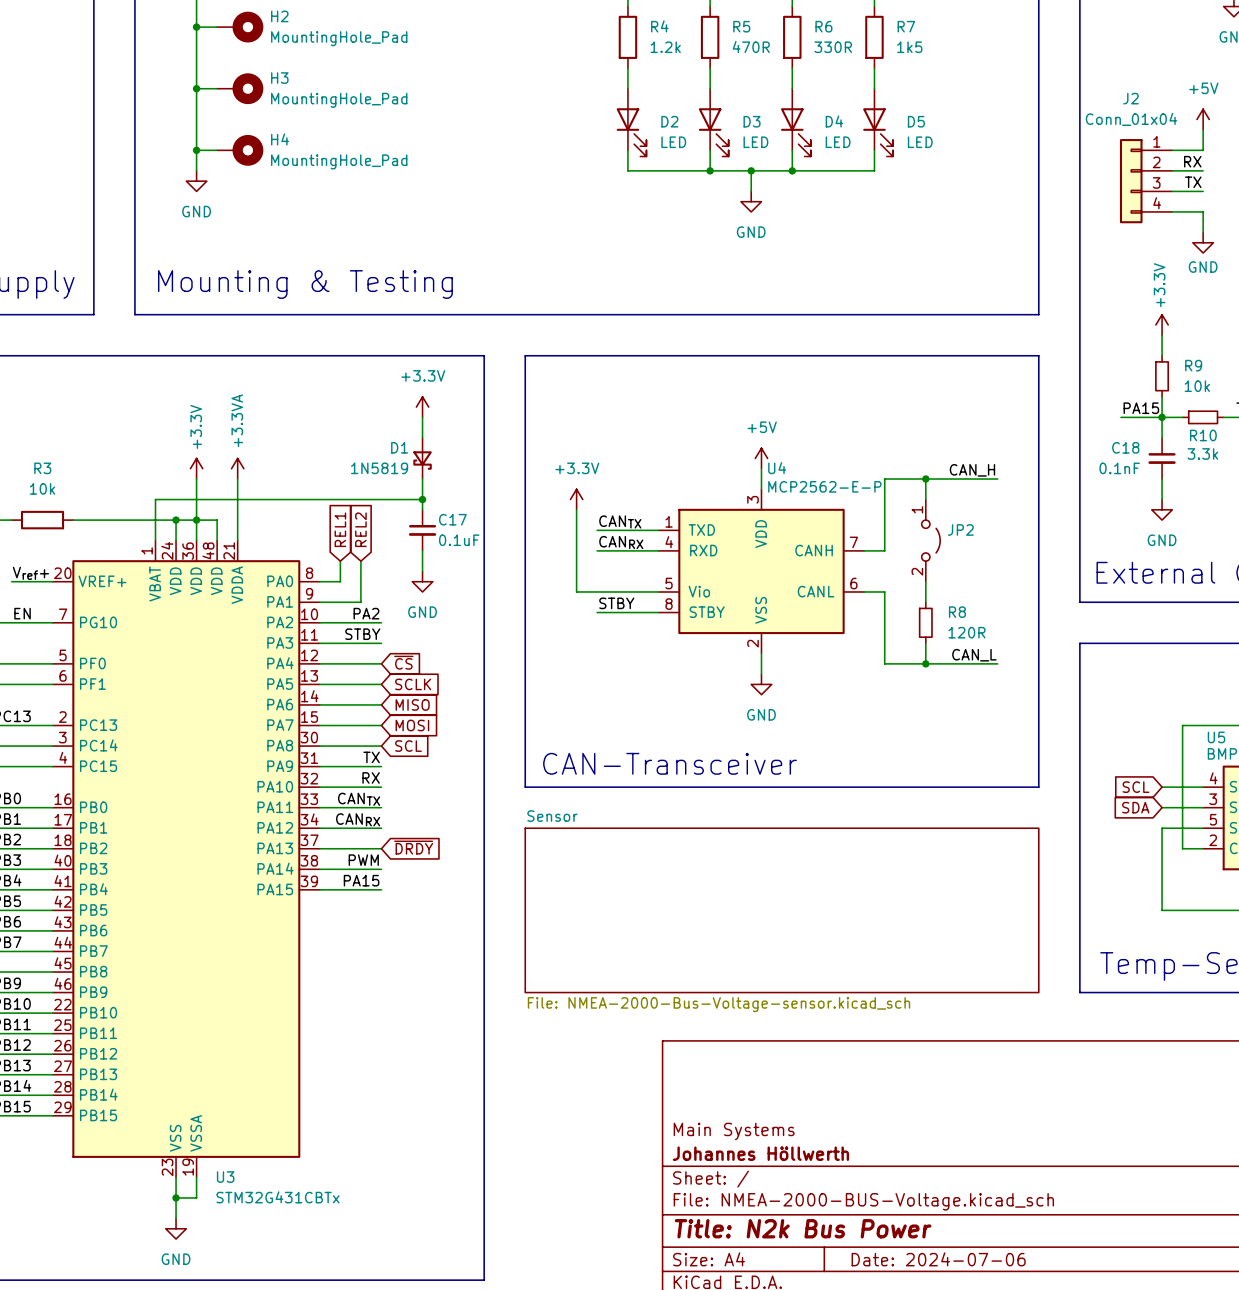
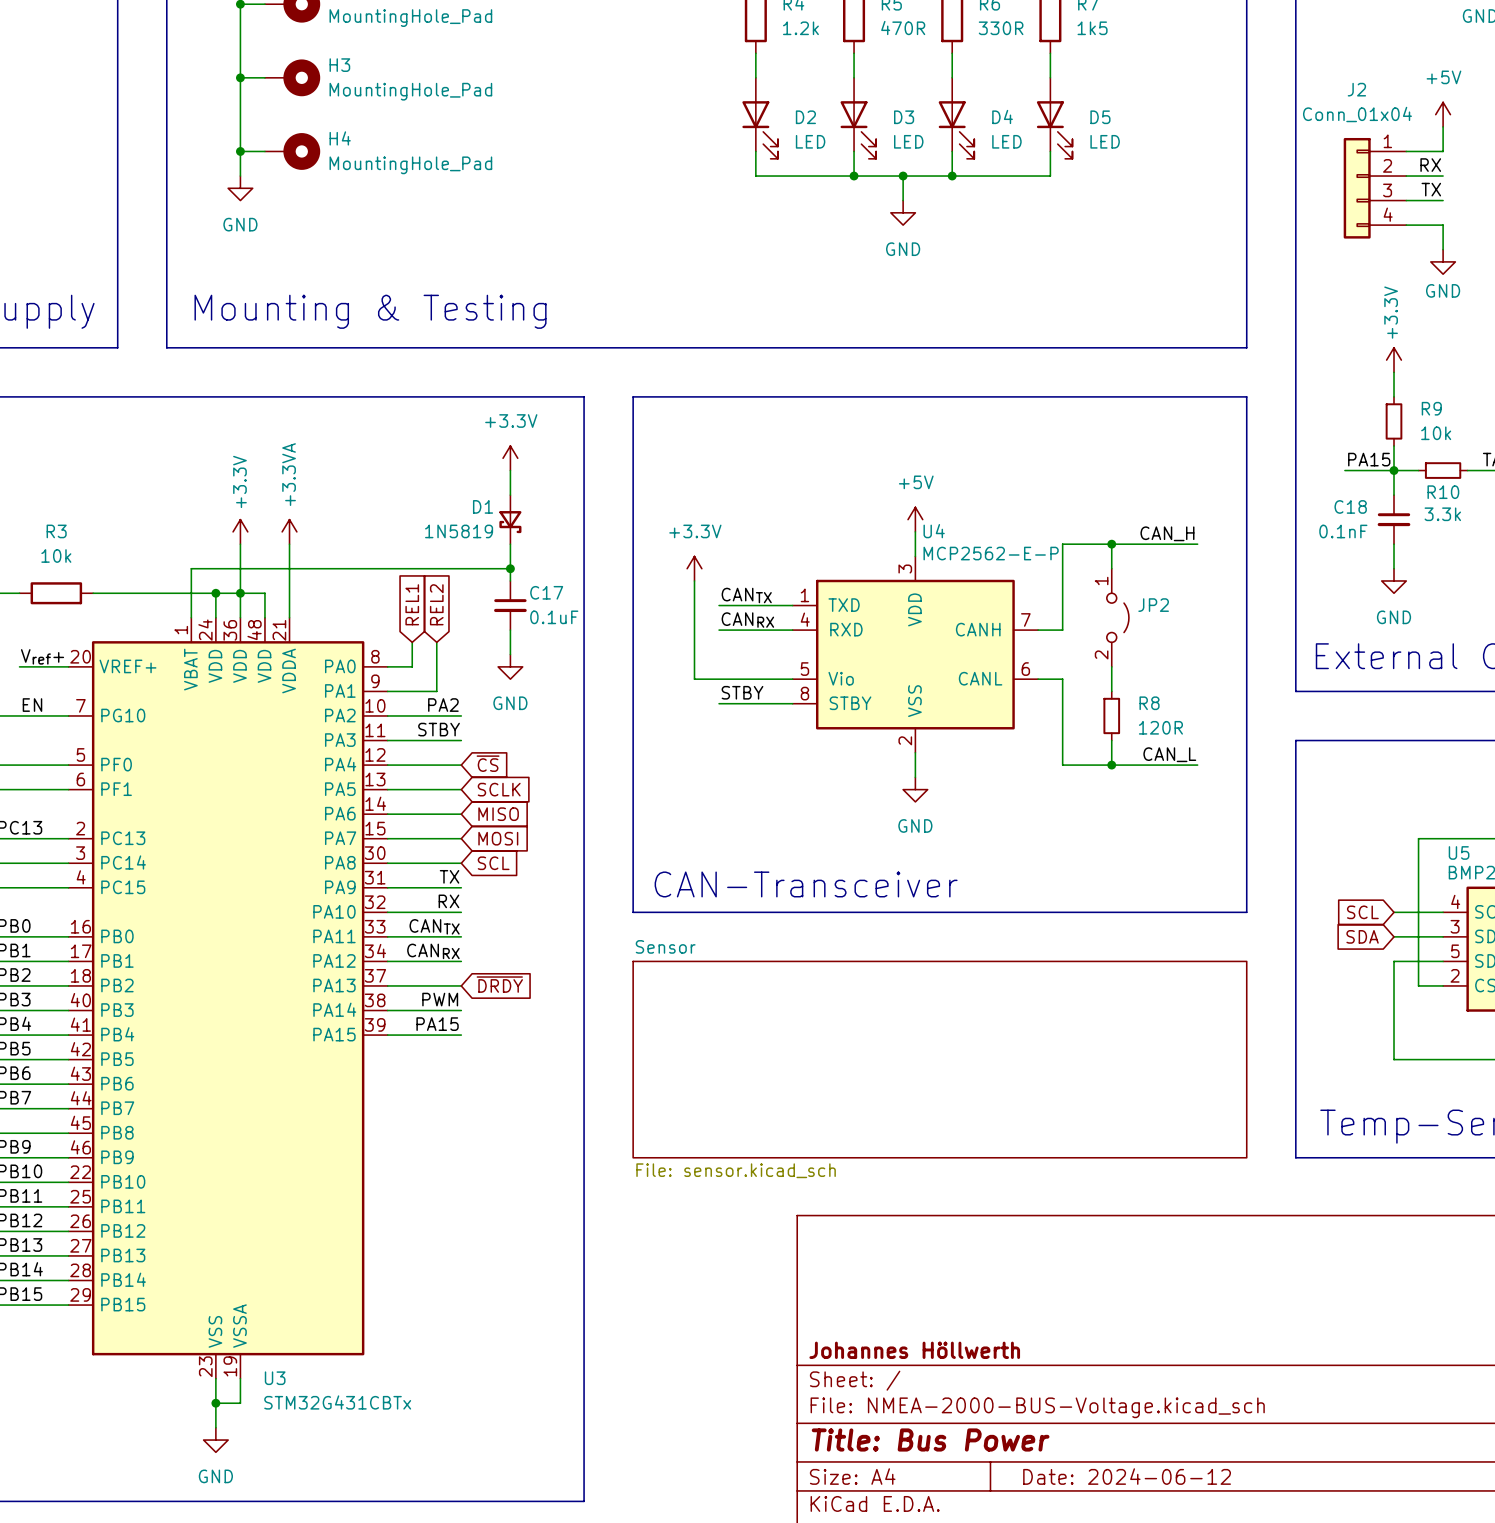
sheet Sensor value: File: NMEA-2000-Bus-Voltage-sensor.kicad_sch (719, 1004) -> File: sensor.kicad_sch (736, 1170)
title block: Main Systems (734, 1131) -> none
title block: Title: N2k Bus Power (803, 1228) -> Title: Bus Power (930, 1439)
title block: Date: 2024-07-06 (938, 1259) -> Date: 2024-06-12 (1127, 1476)

